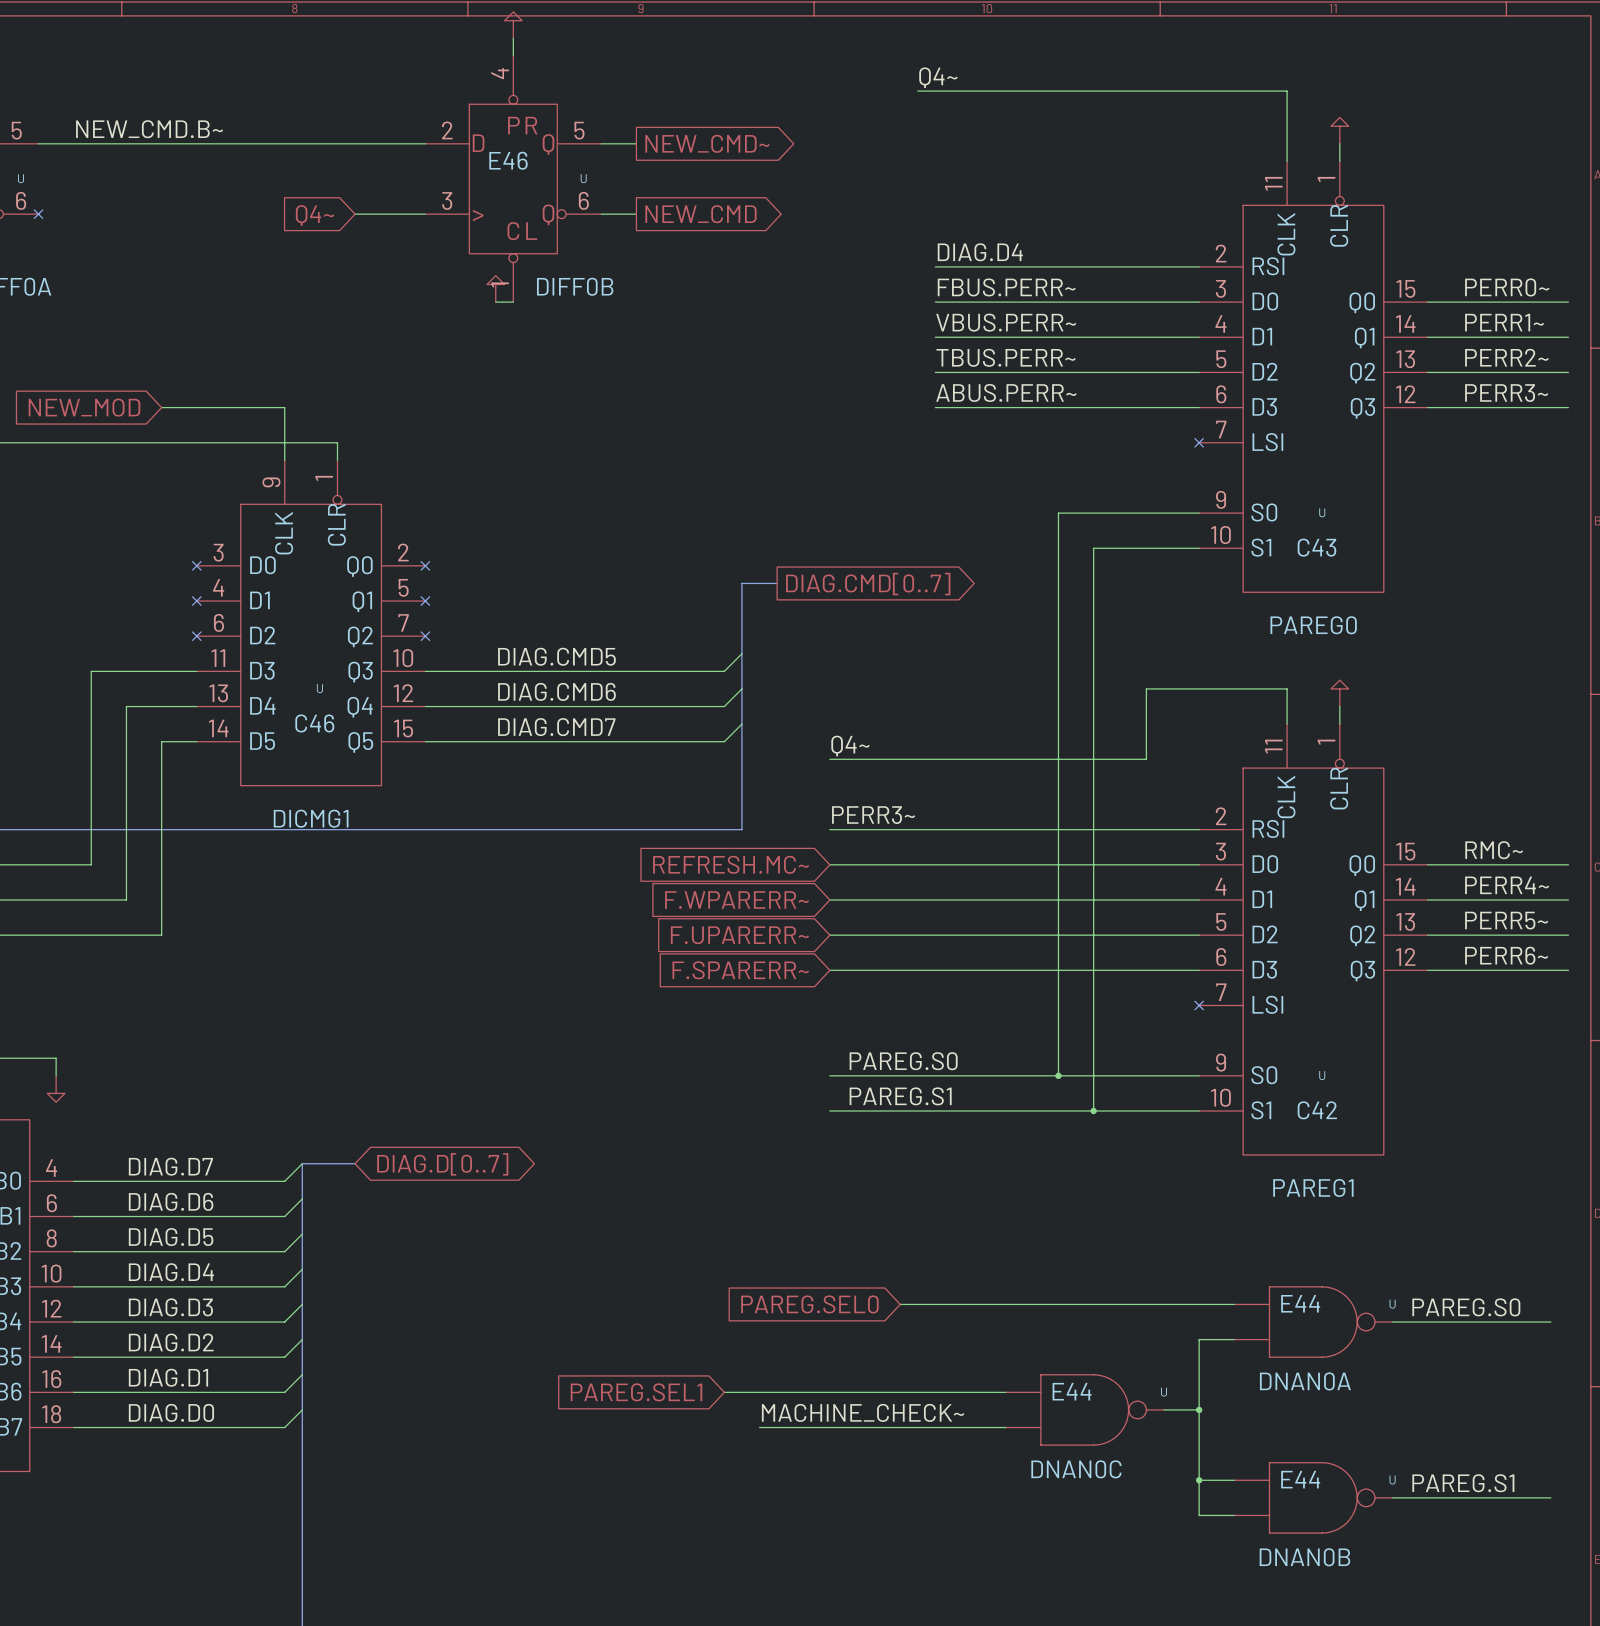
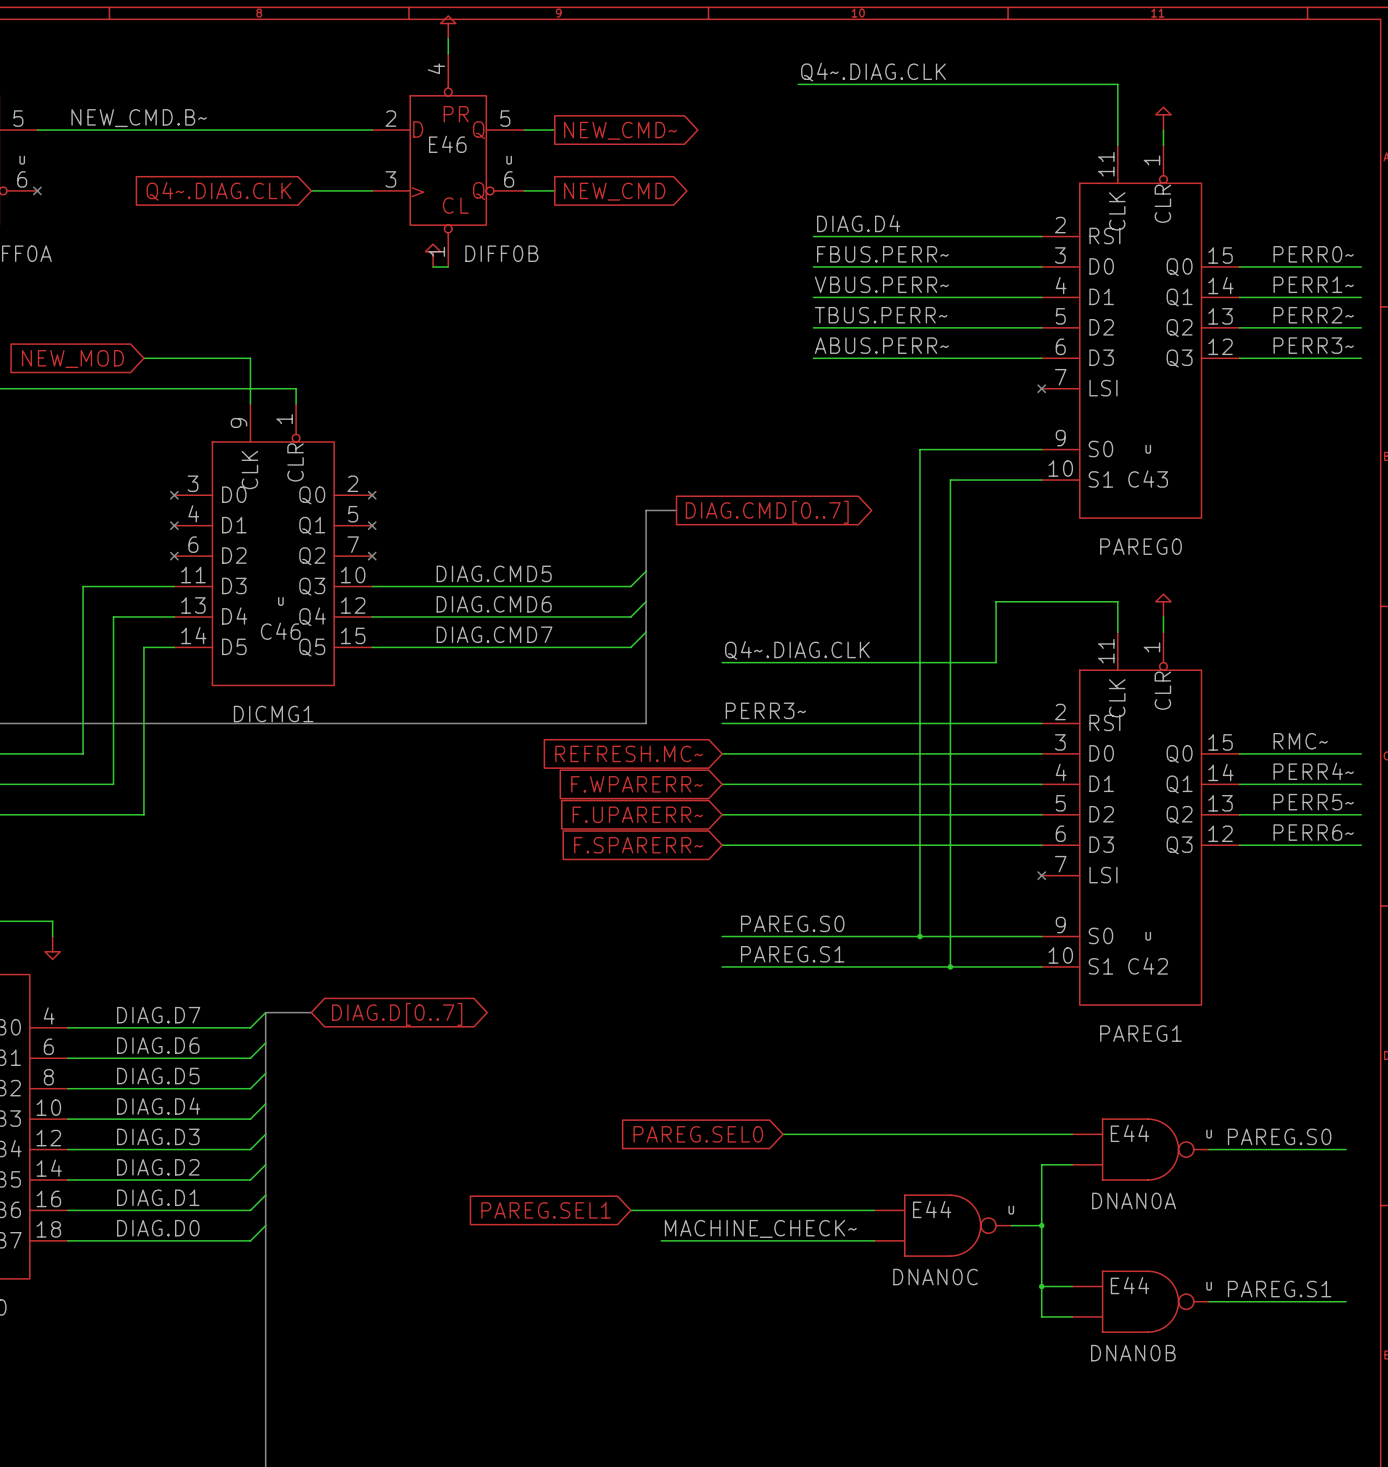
label: Q4~ (938, 77) -> Q4~.DIAG.CLK (873, 72)
global label: Q4~ (315, 215) -> Q4~.DIAG.CLK (218, 191)
label: Q4~ (850, 746) -> Q4~.DIAG.CLK (797, 650)

